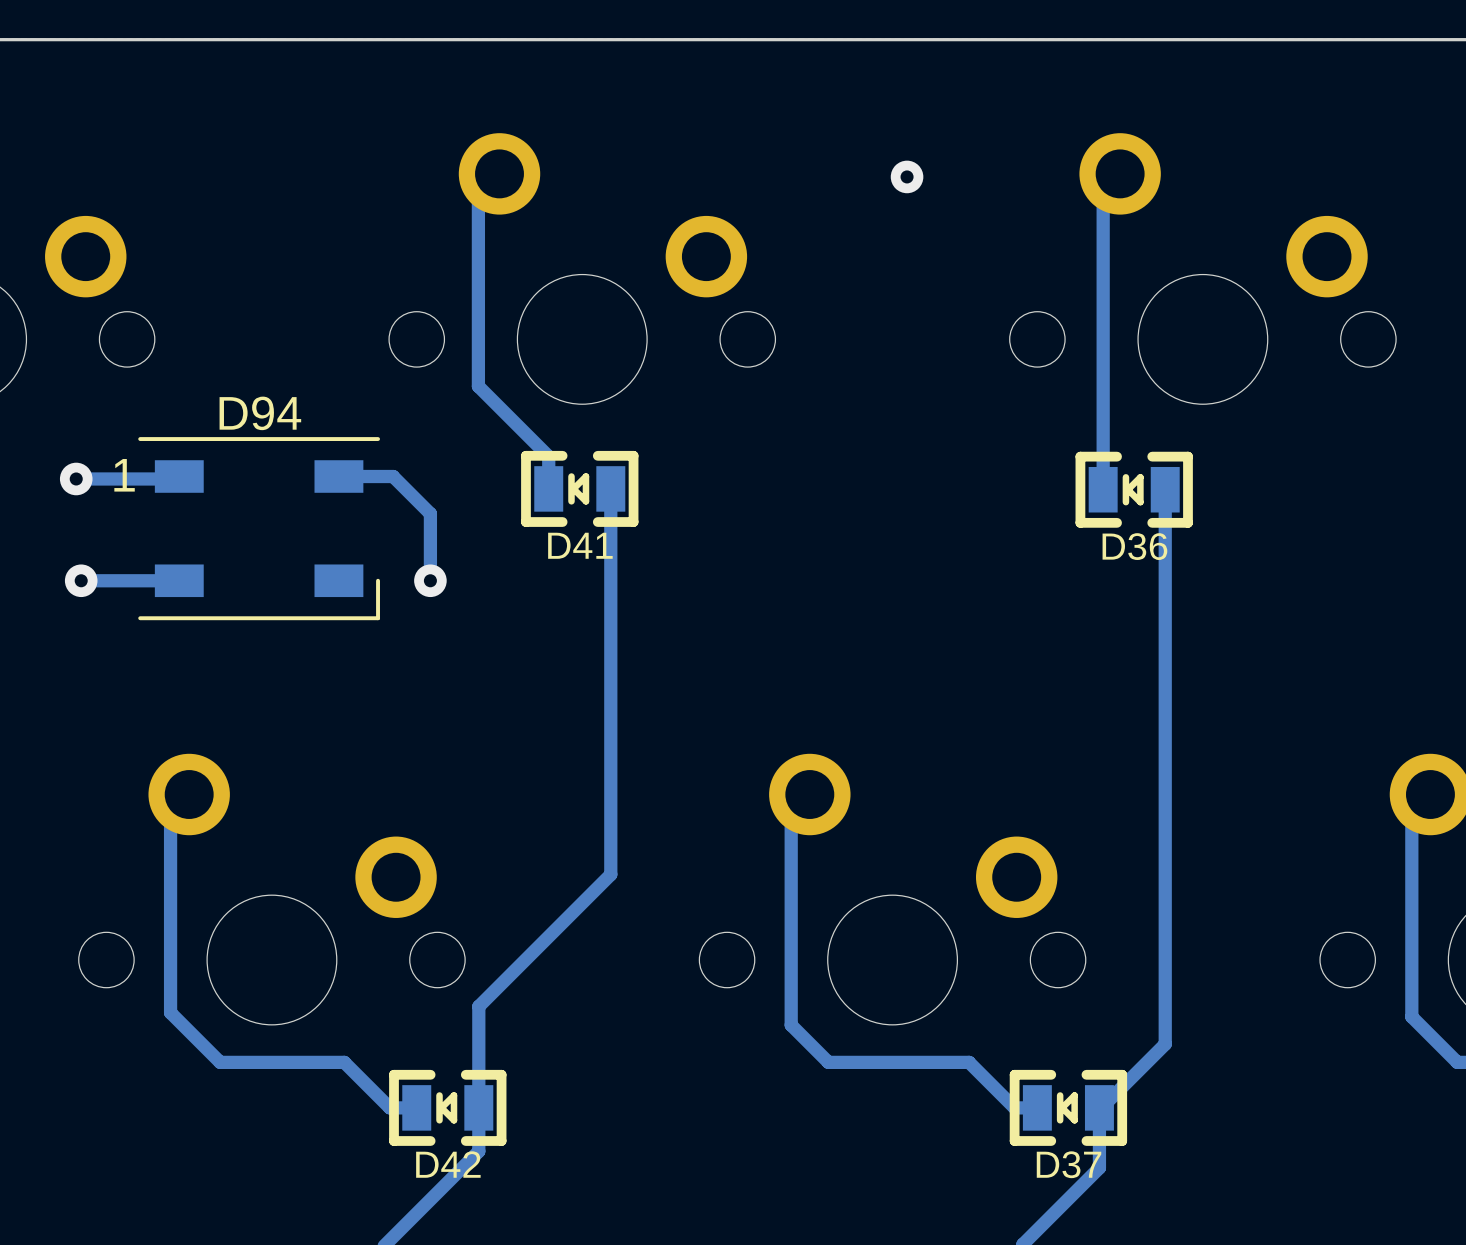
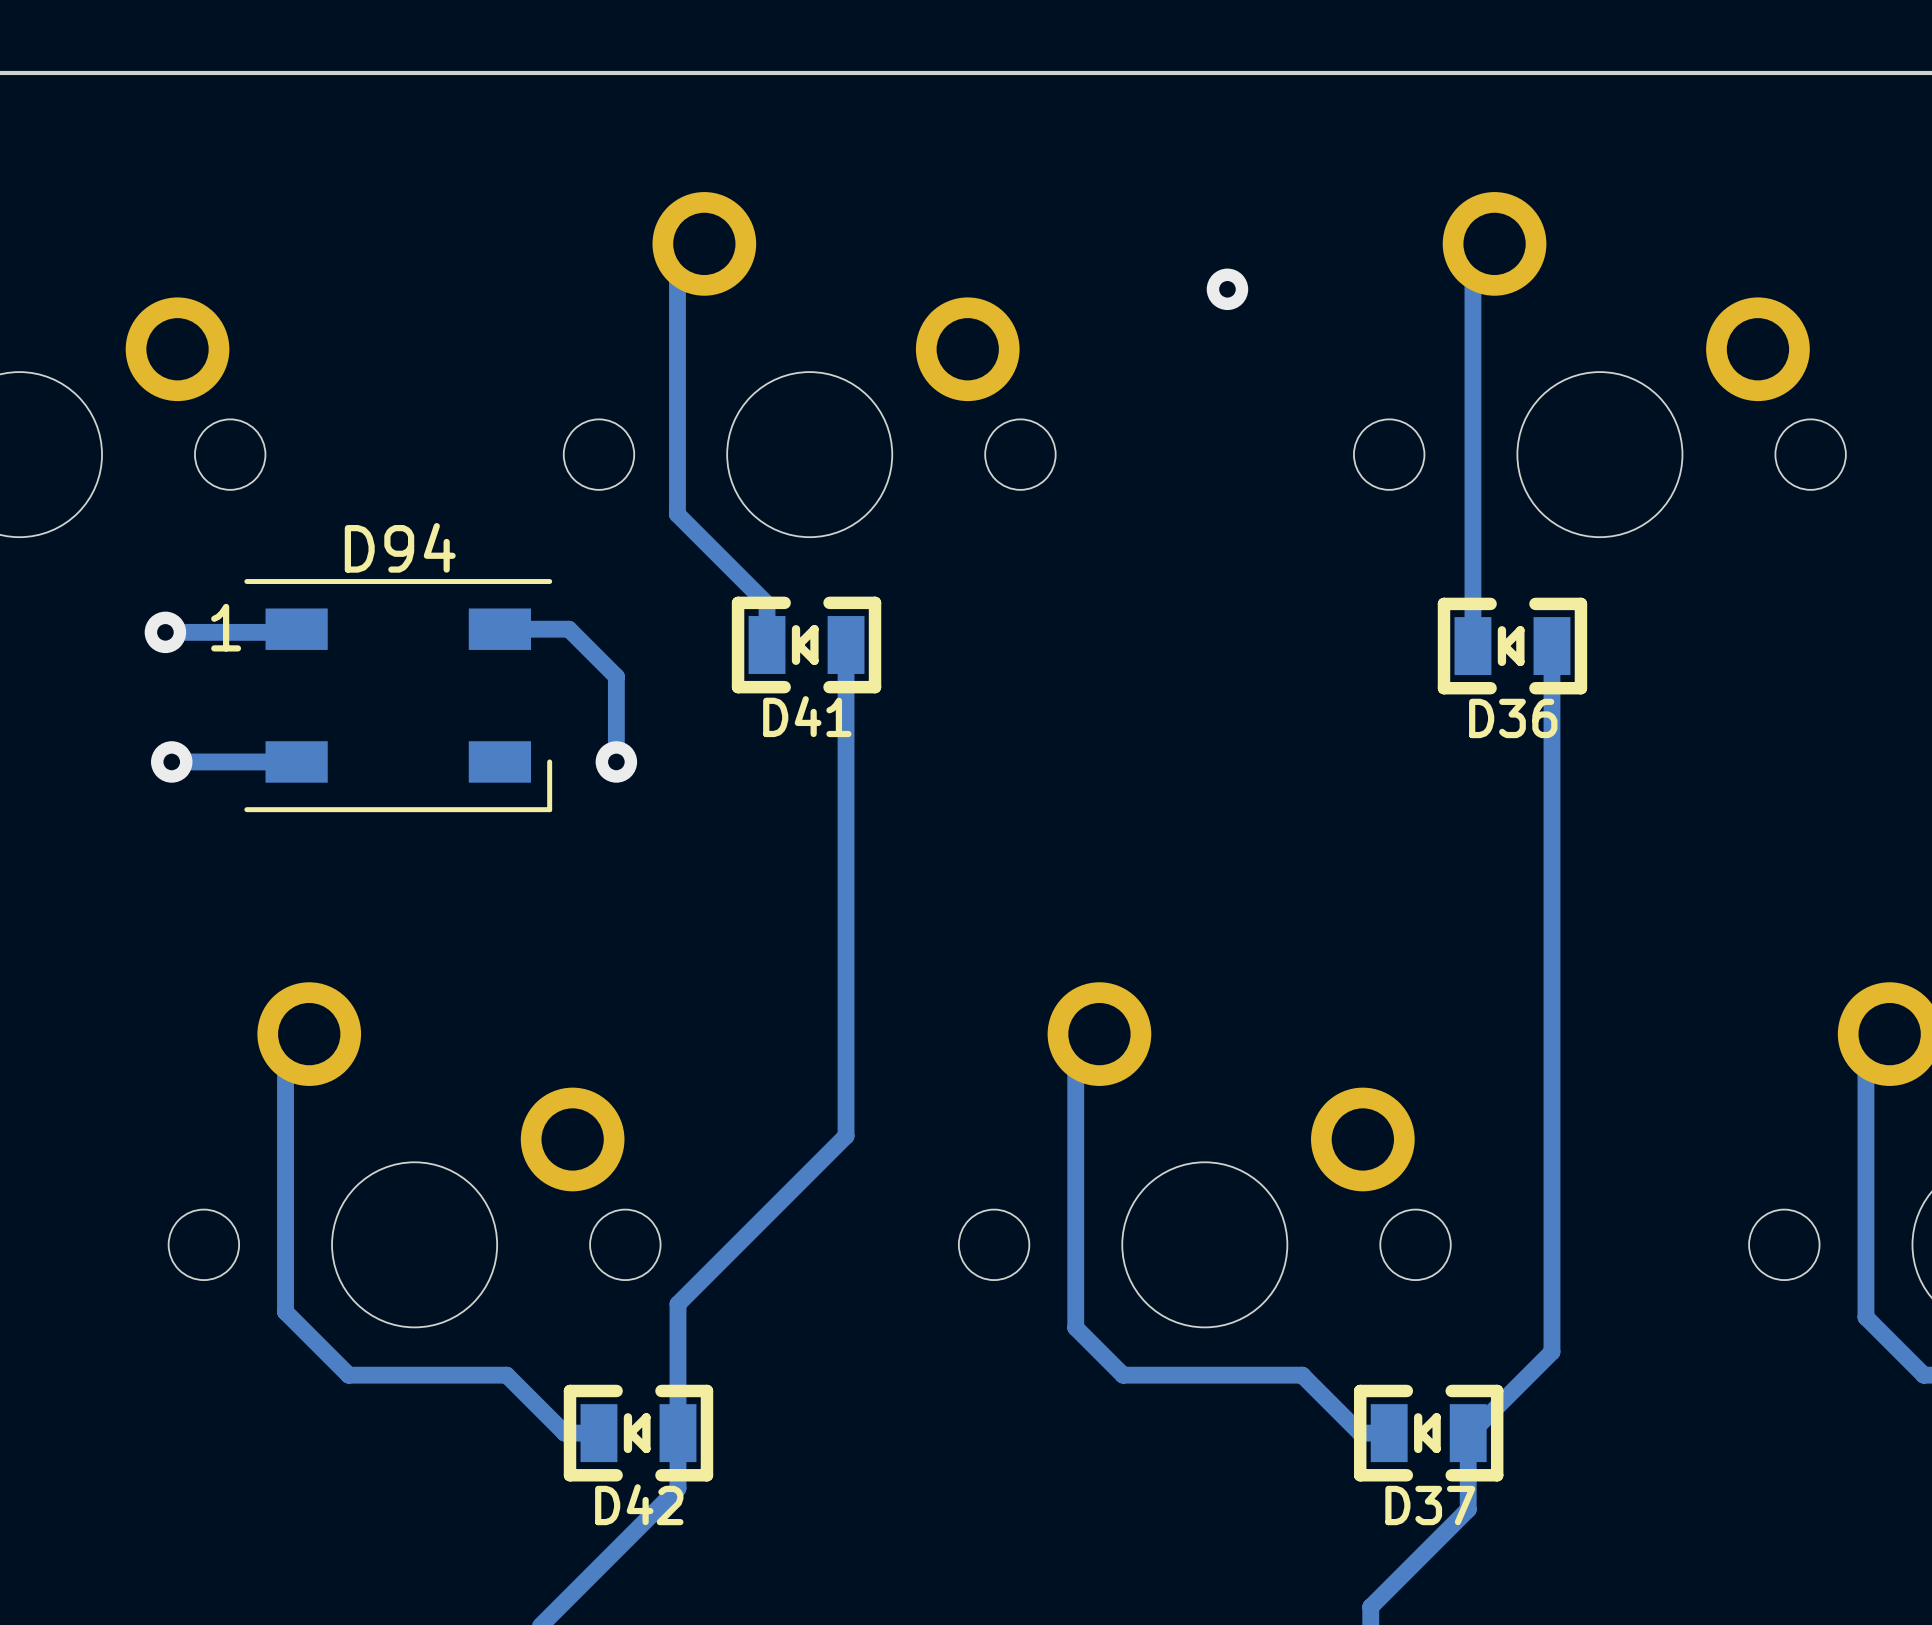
via position: (907, 176) -> (1227, 289)

